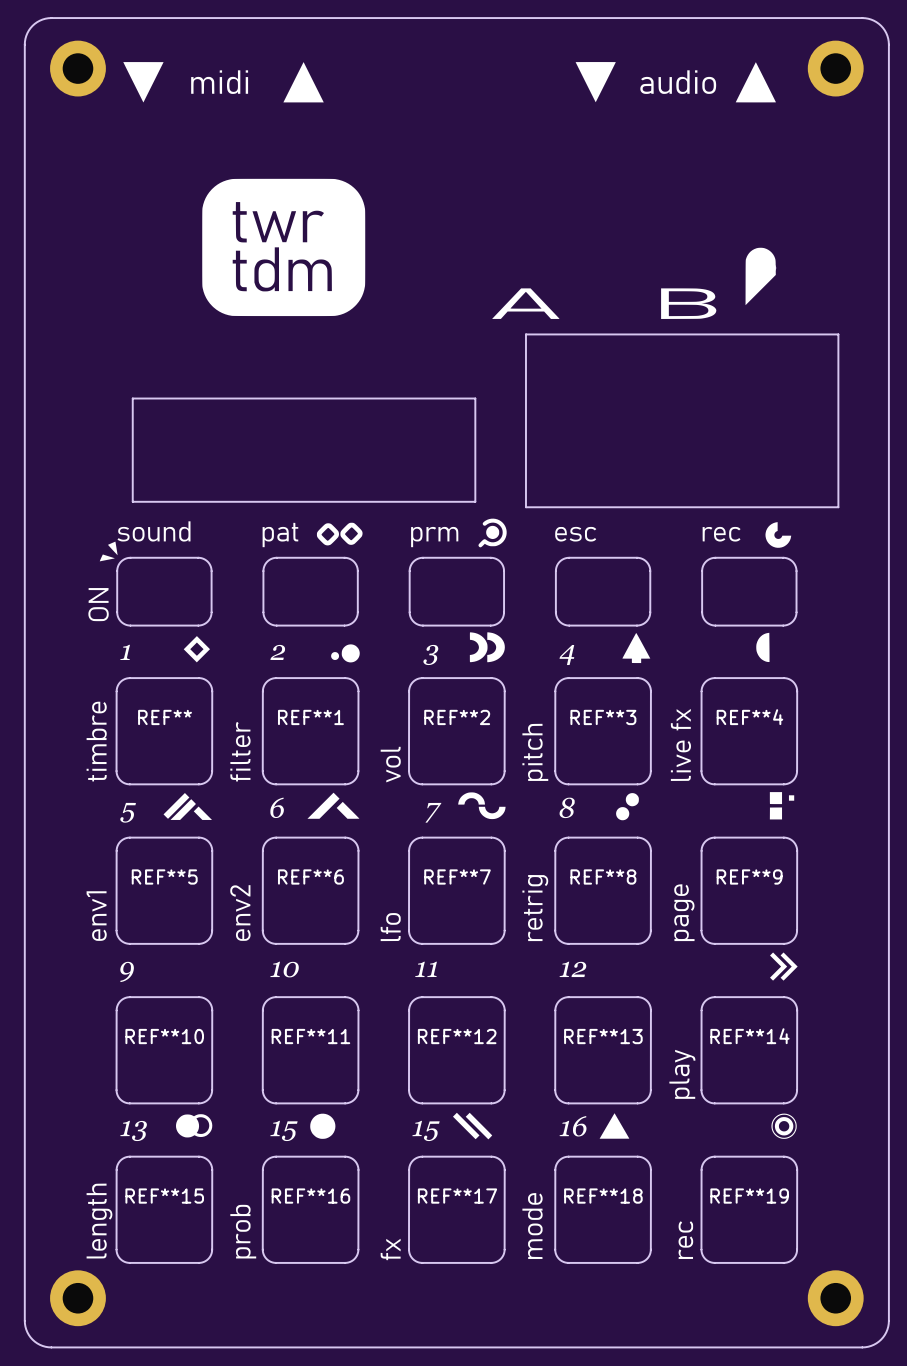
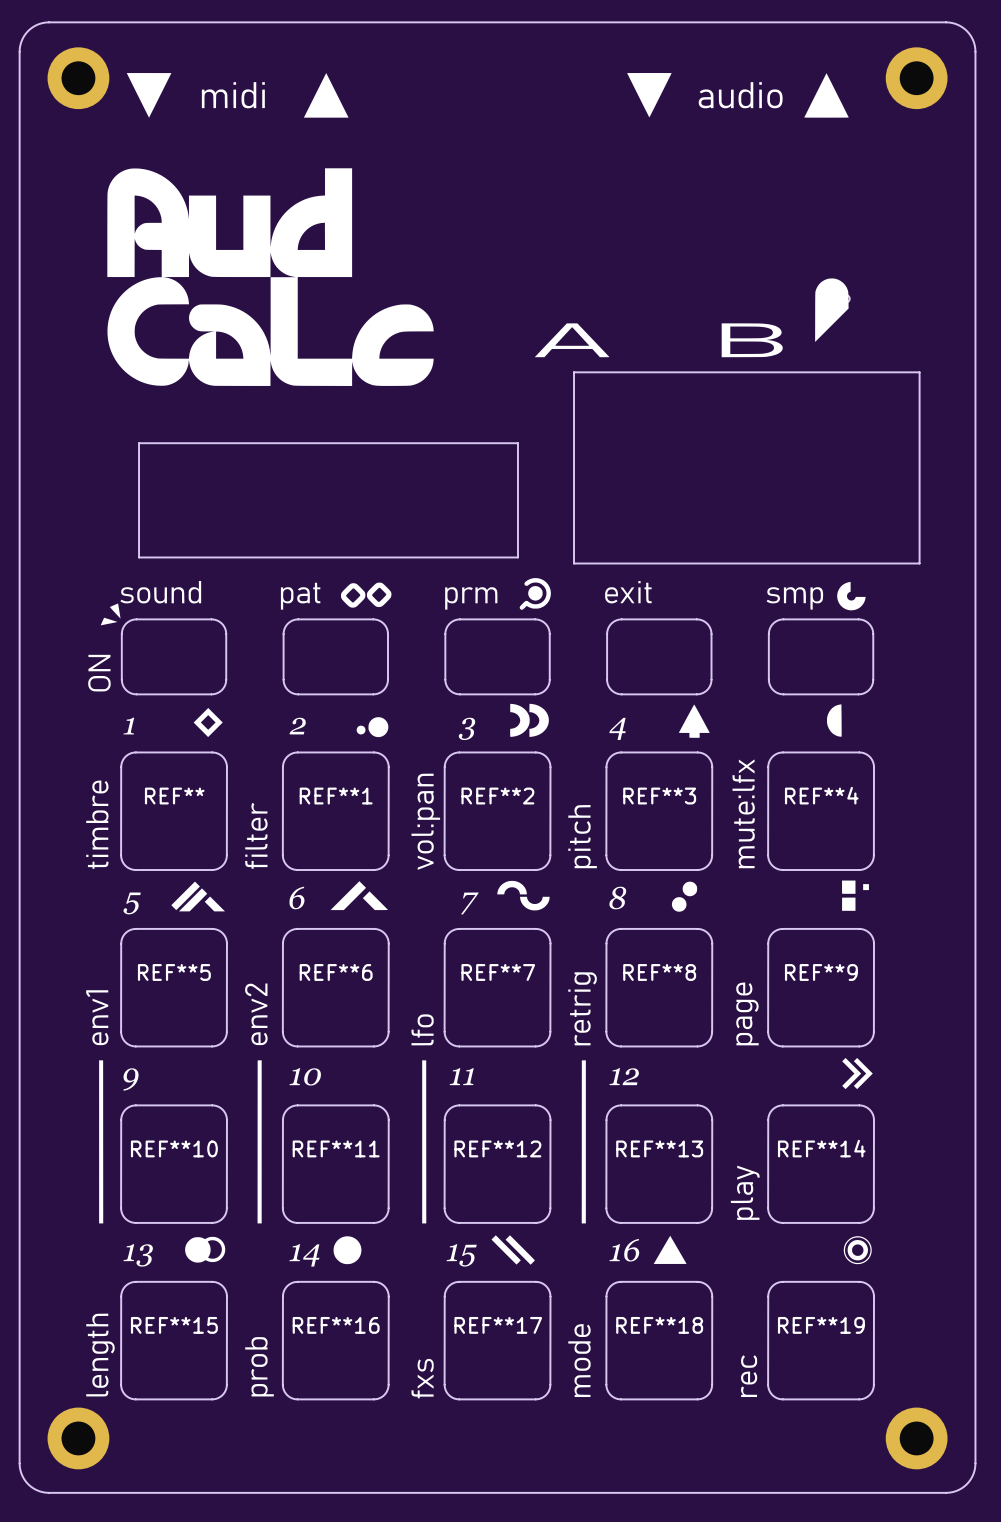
drawing shape: [86, 62, 798, 1261] -> [86, 72, 873, 1399]

